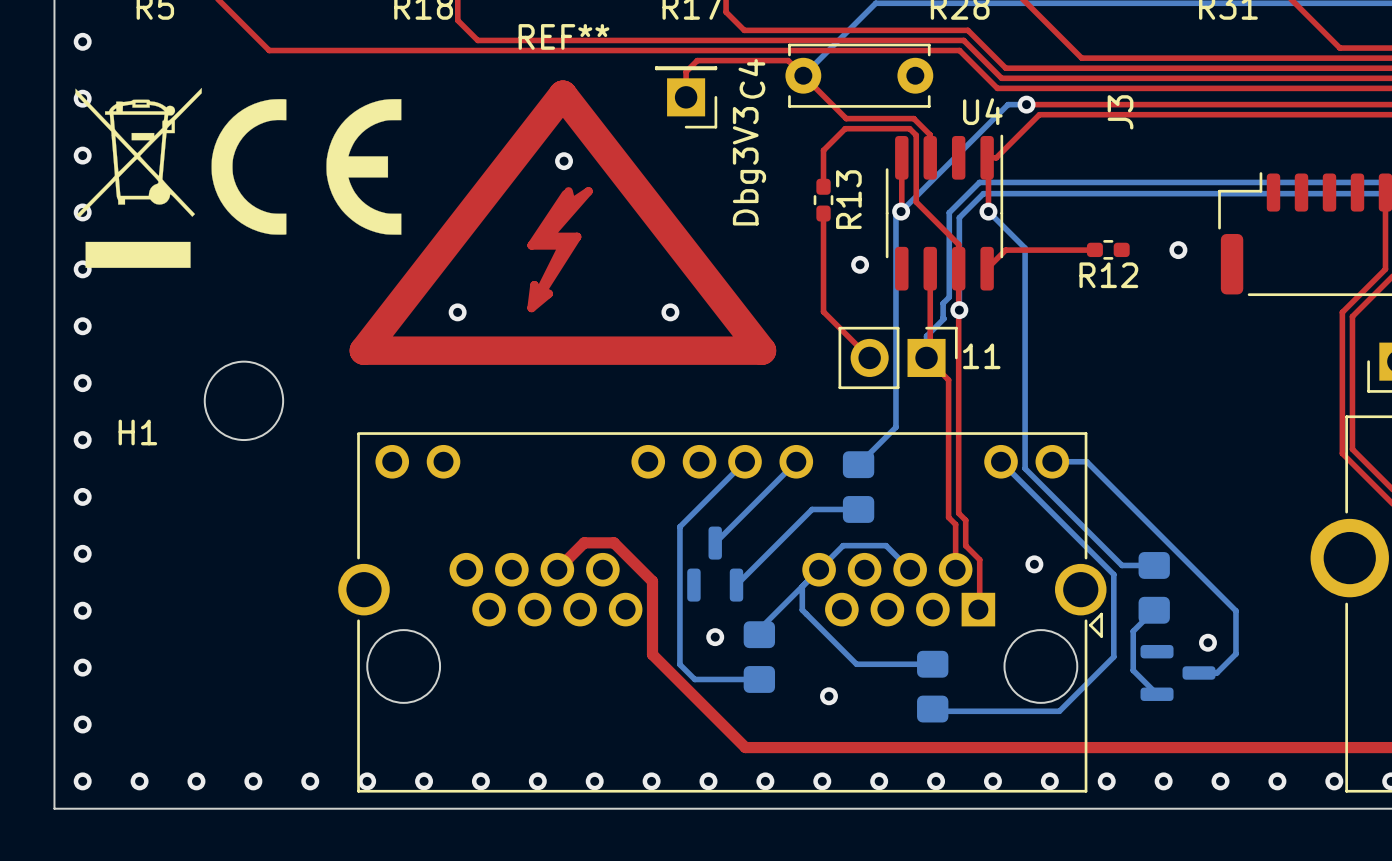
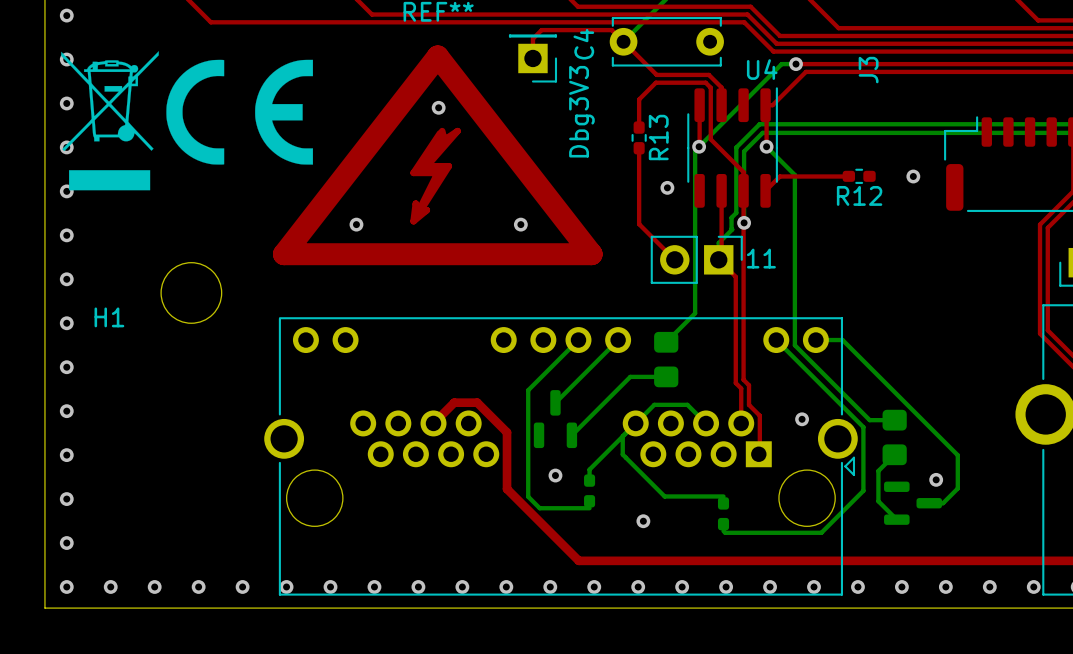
part footprint: [743, 621, 776, 693] -> [584, 474, 596, 508]
part footprint: [917, 650, 949, 723] -> [717, 497, 730, 531]

